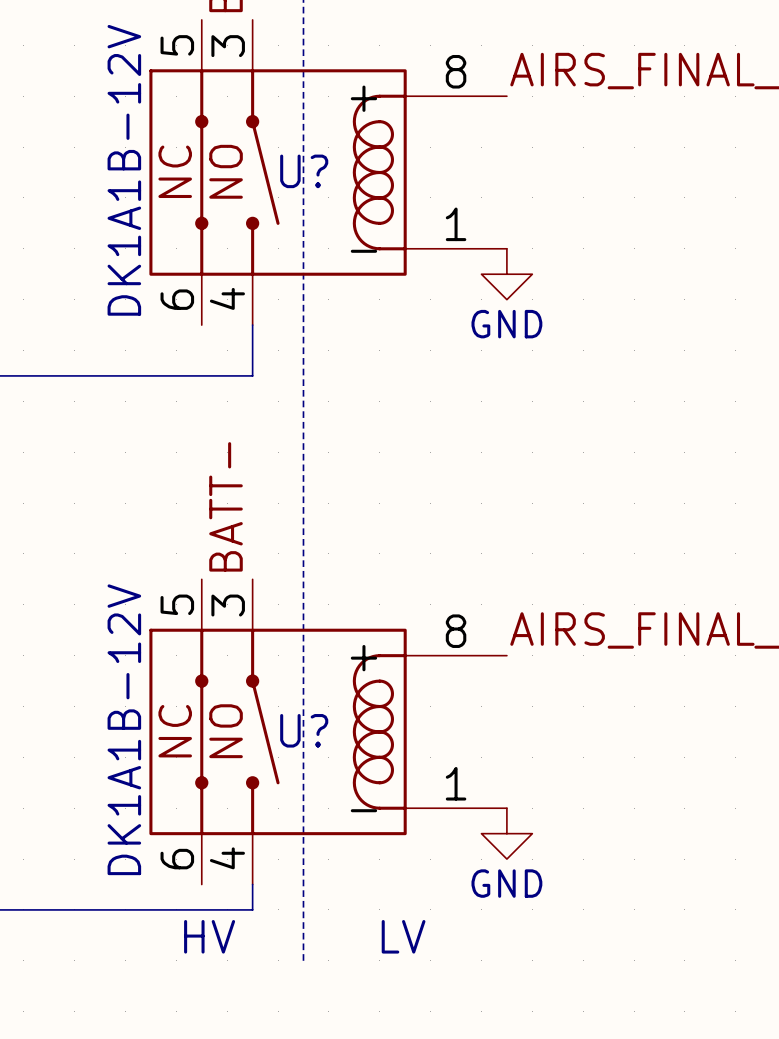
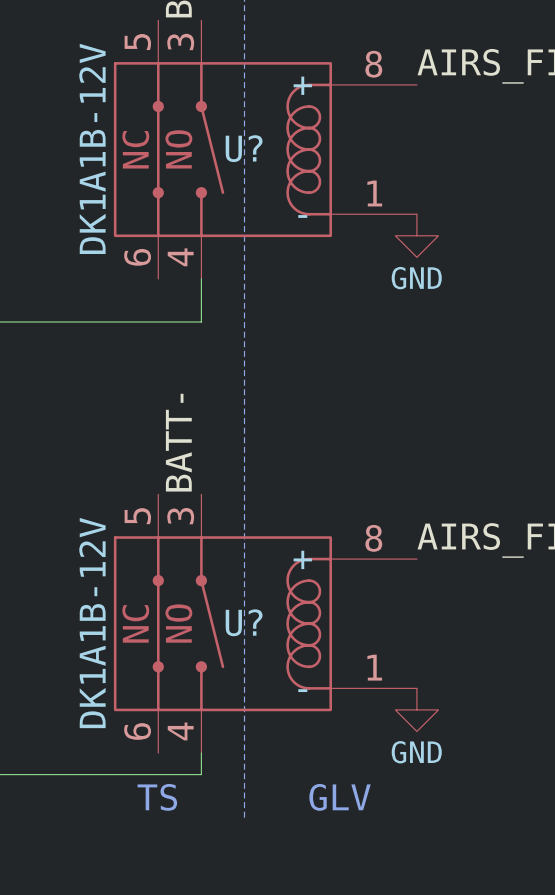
text: HV LV (304, 936) -> TS GLV (254, 797)

